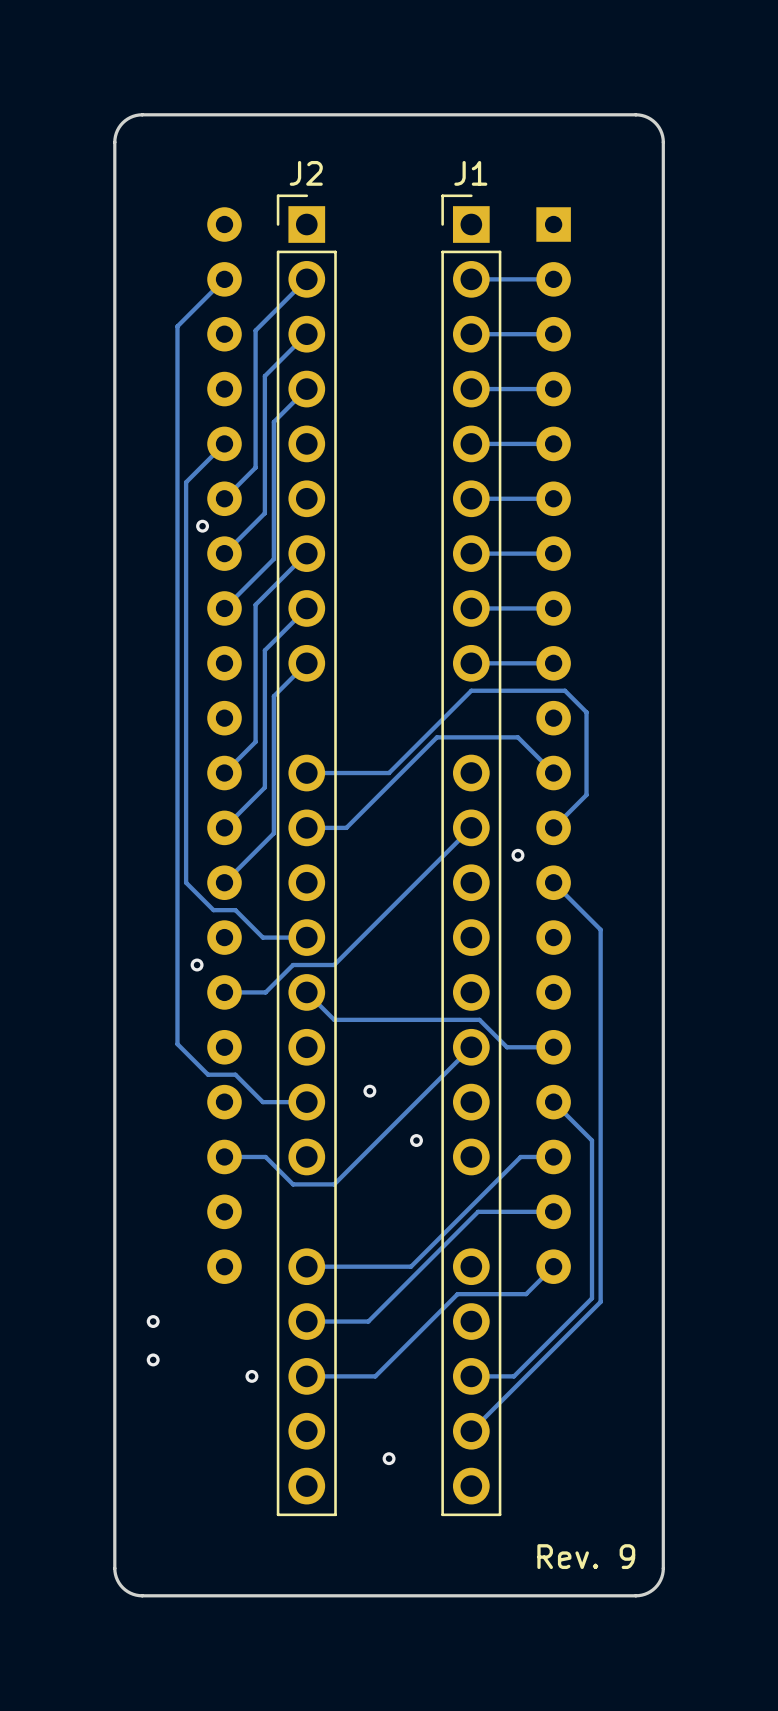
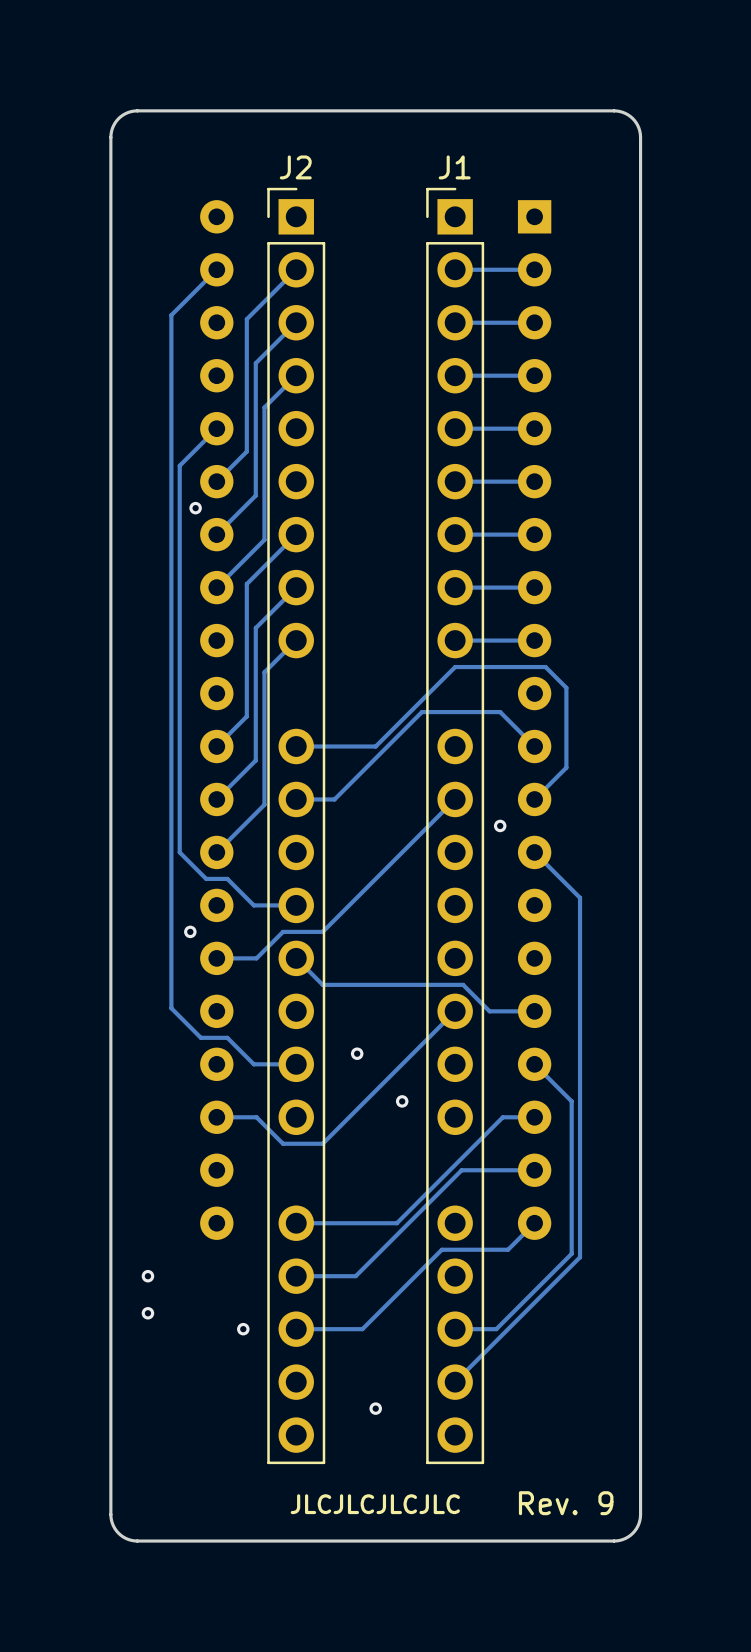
text: none -> JLCJLCJLCJLC (375, 1504)

